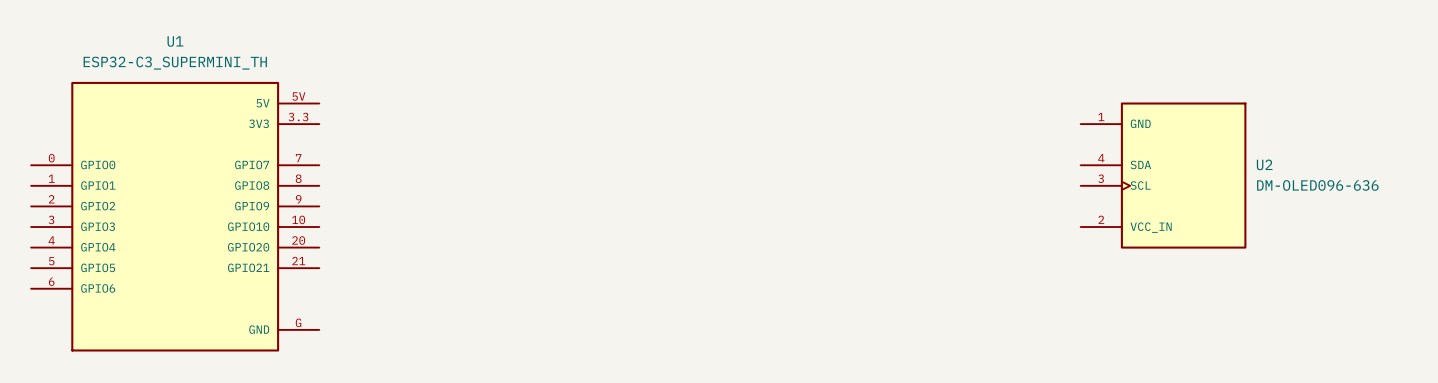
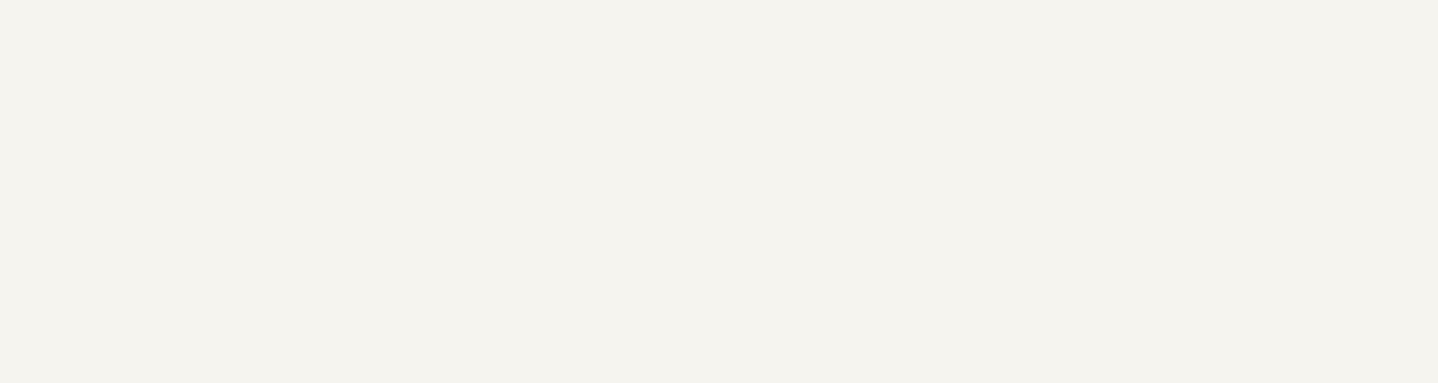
U2: DM-OLED096-636 (1163, 175) -> none
U1: ESP32-C3_SUPERMINI_TH (175, 216) -> none

